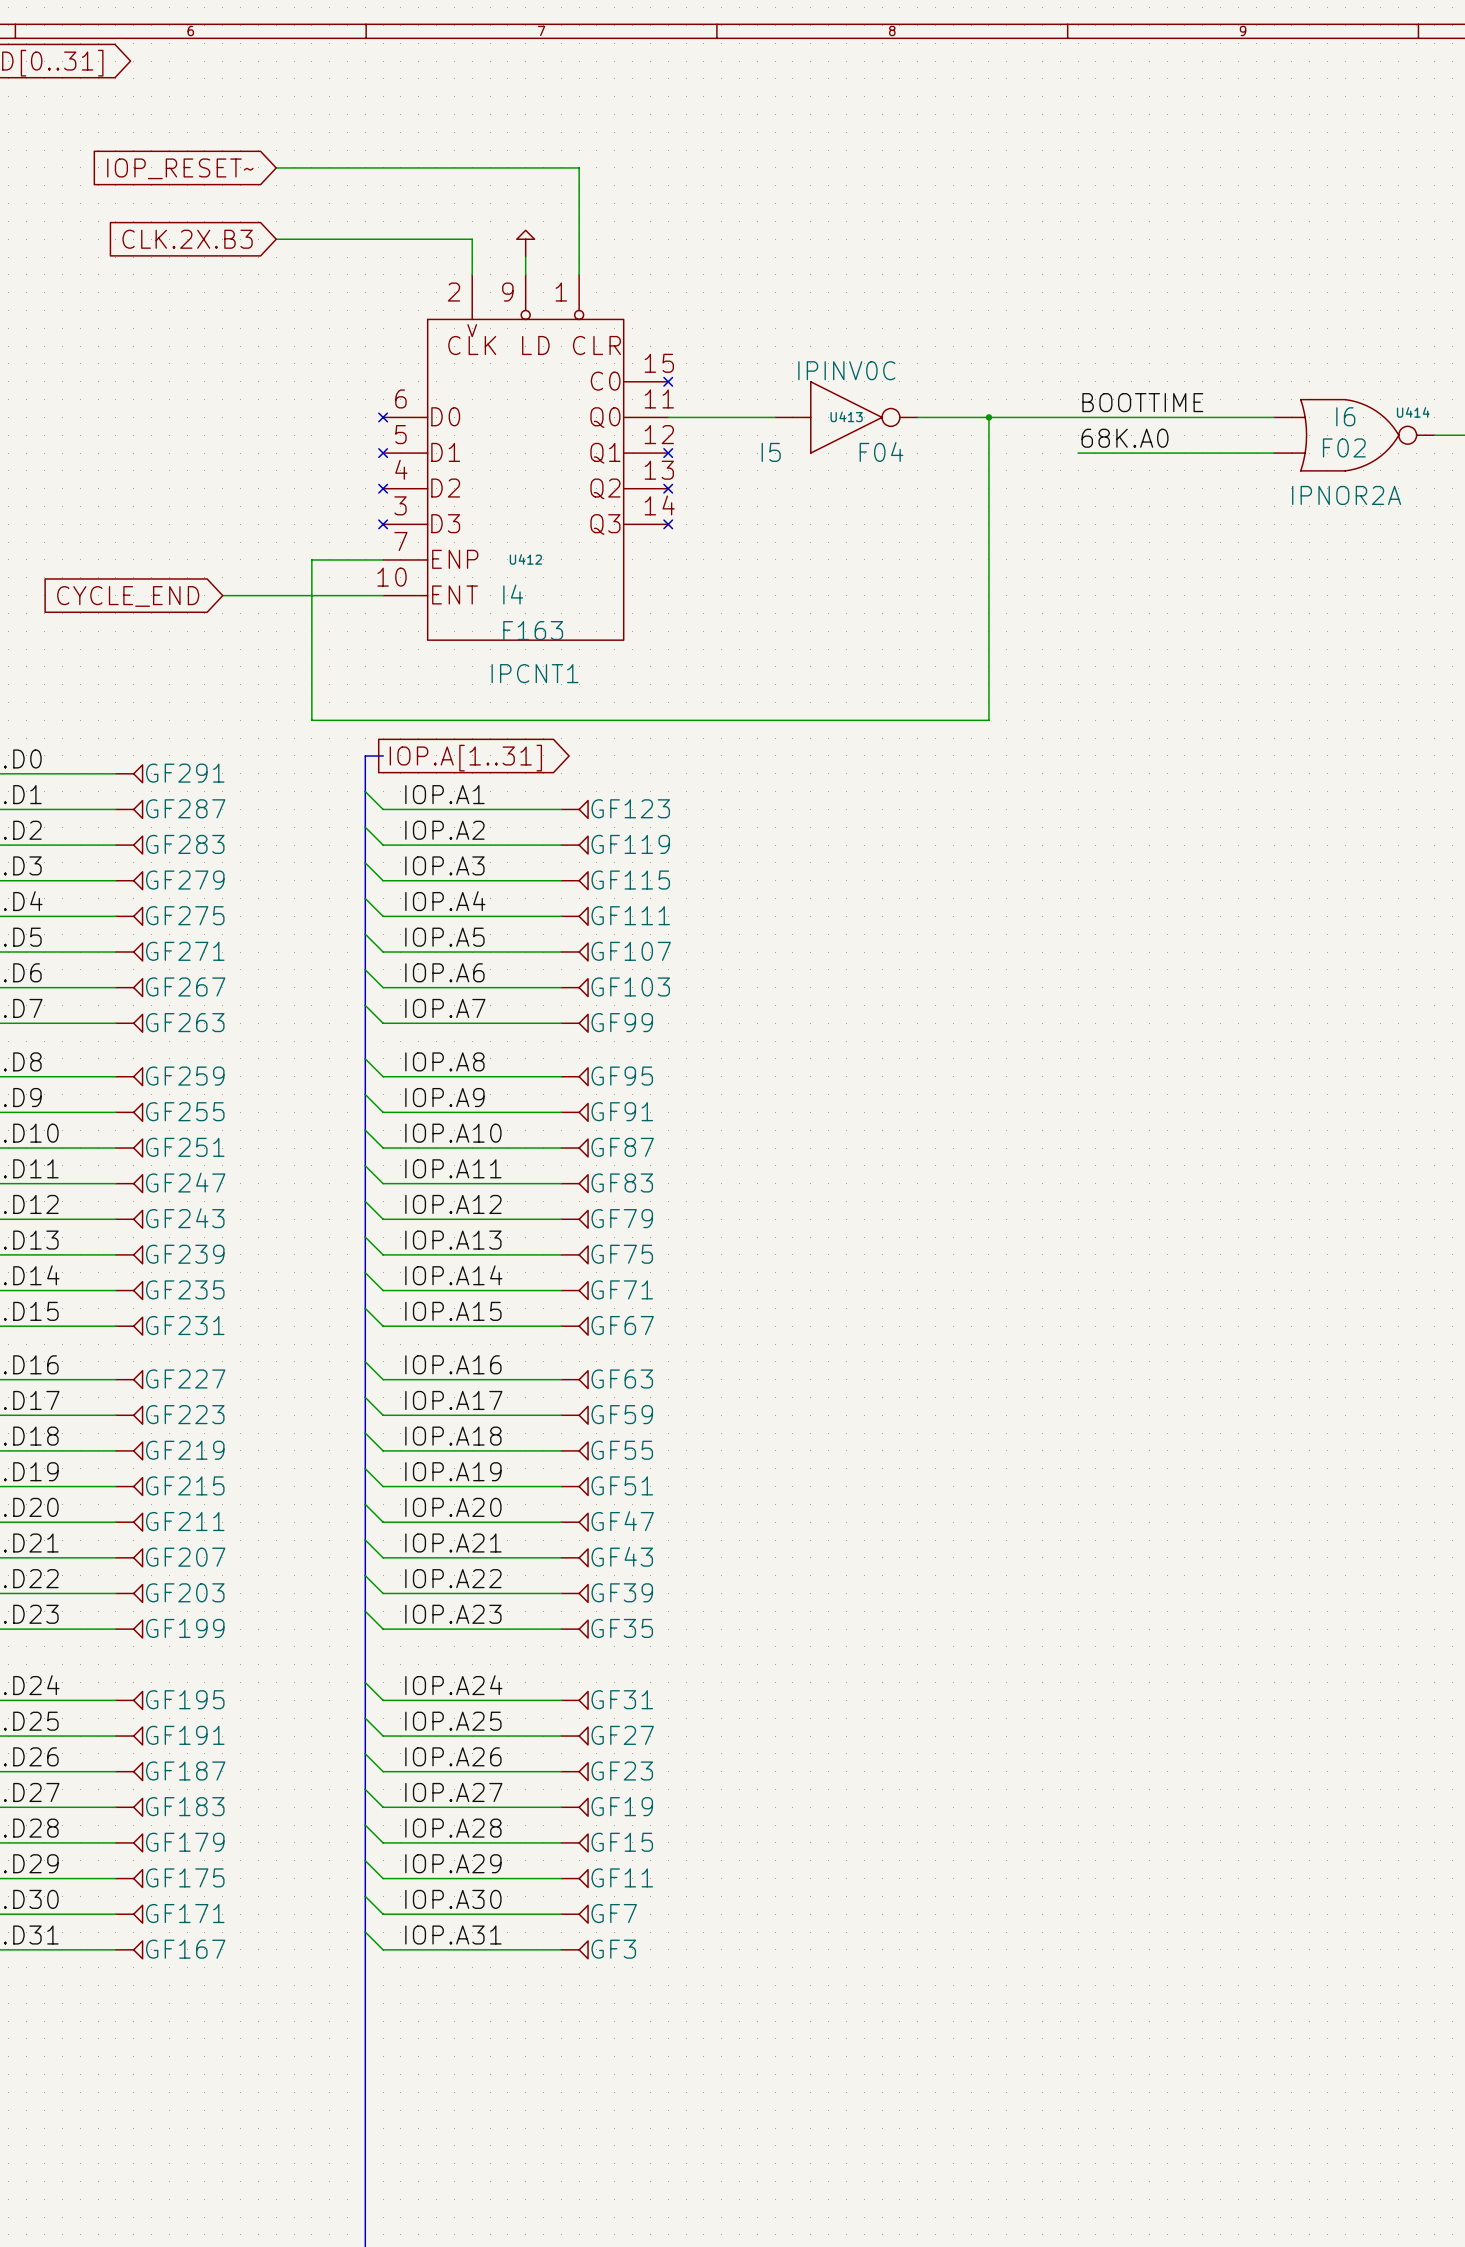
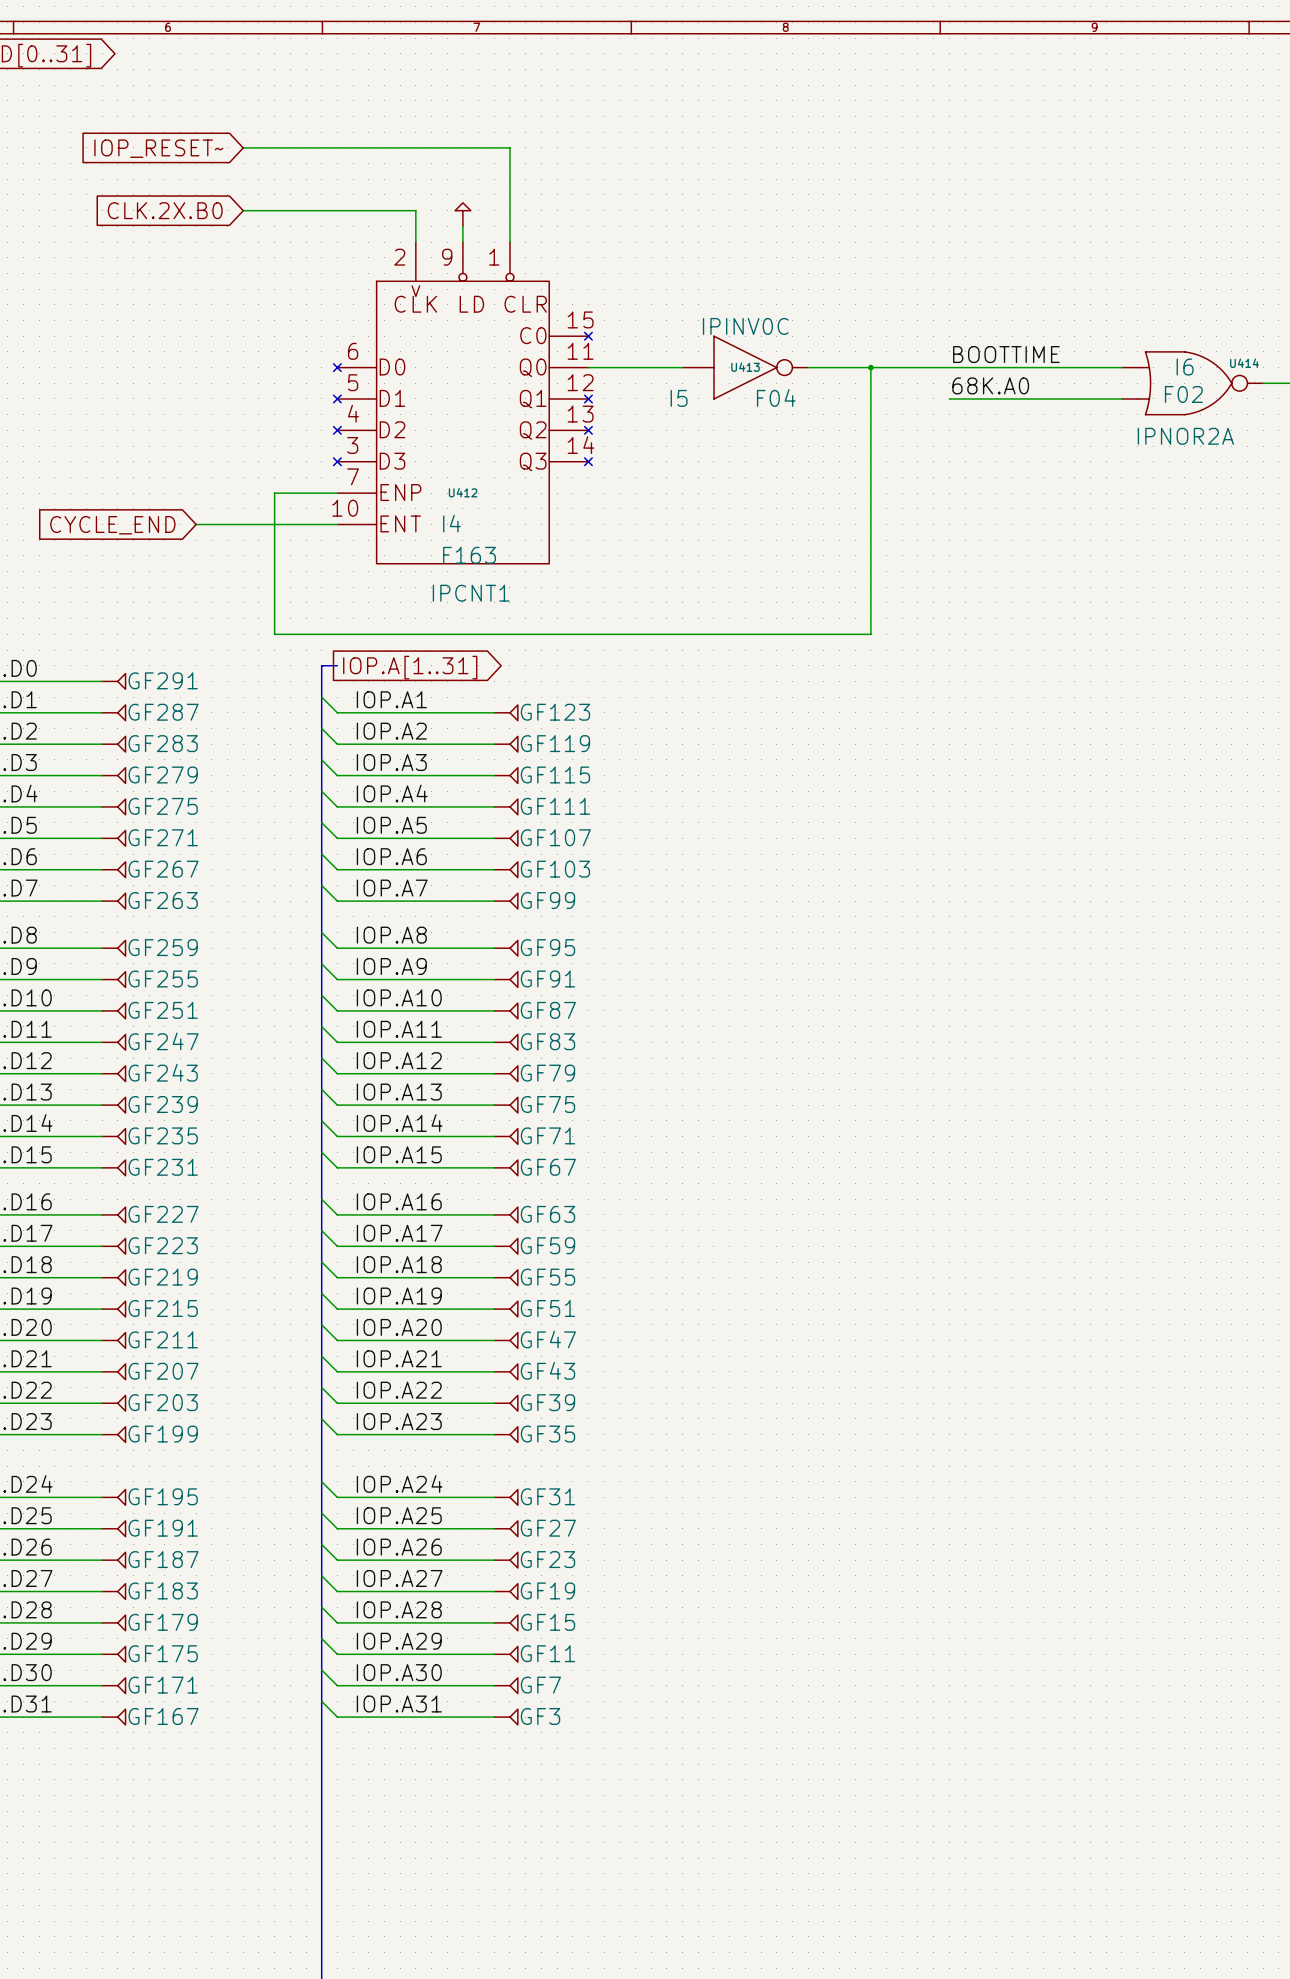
global label: CLK.2X.B3 (187, 239) -> CLK.2X.B0 (165, 210)

